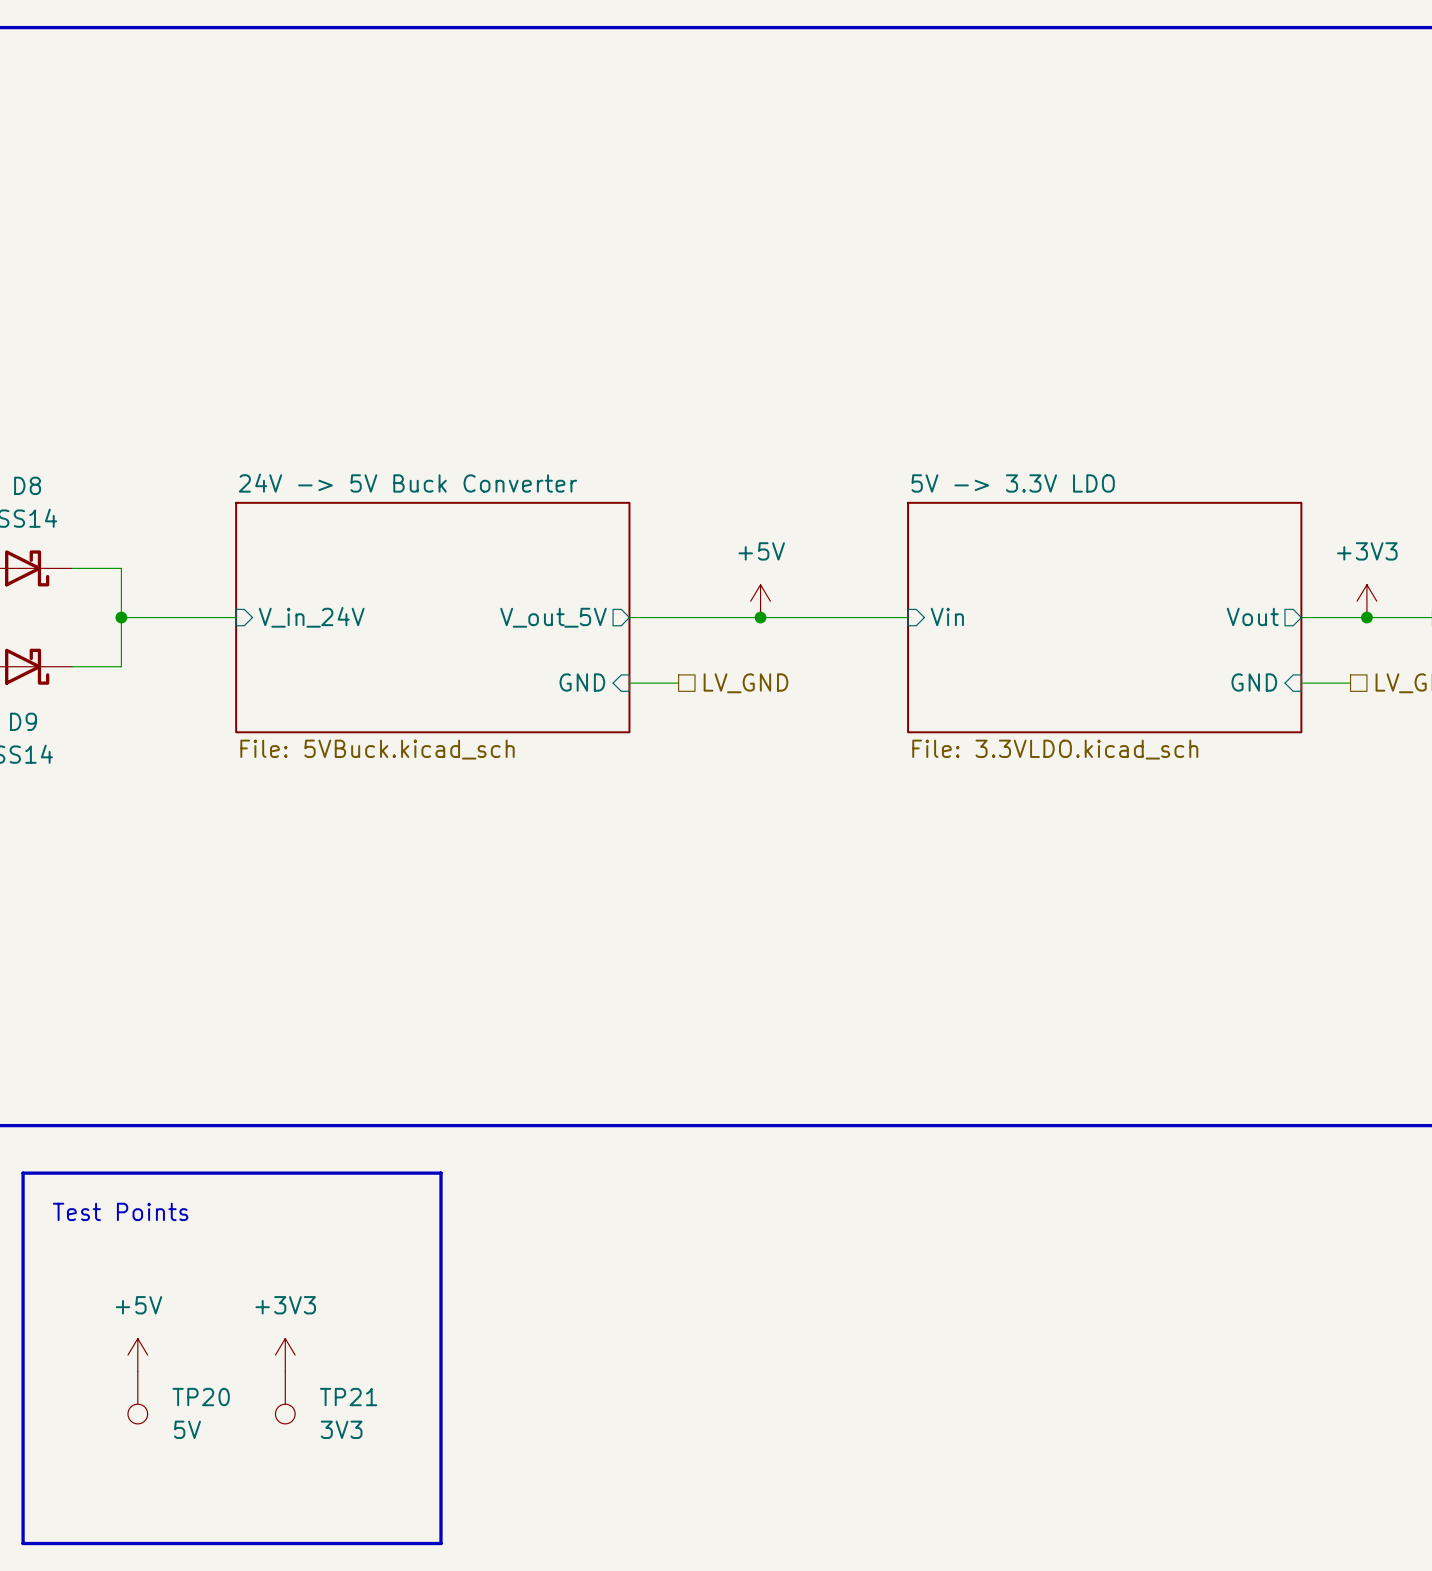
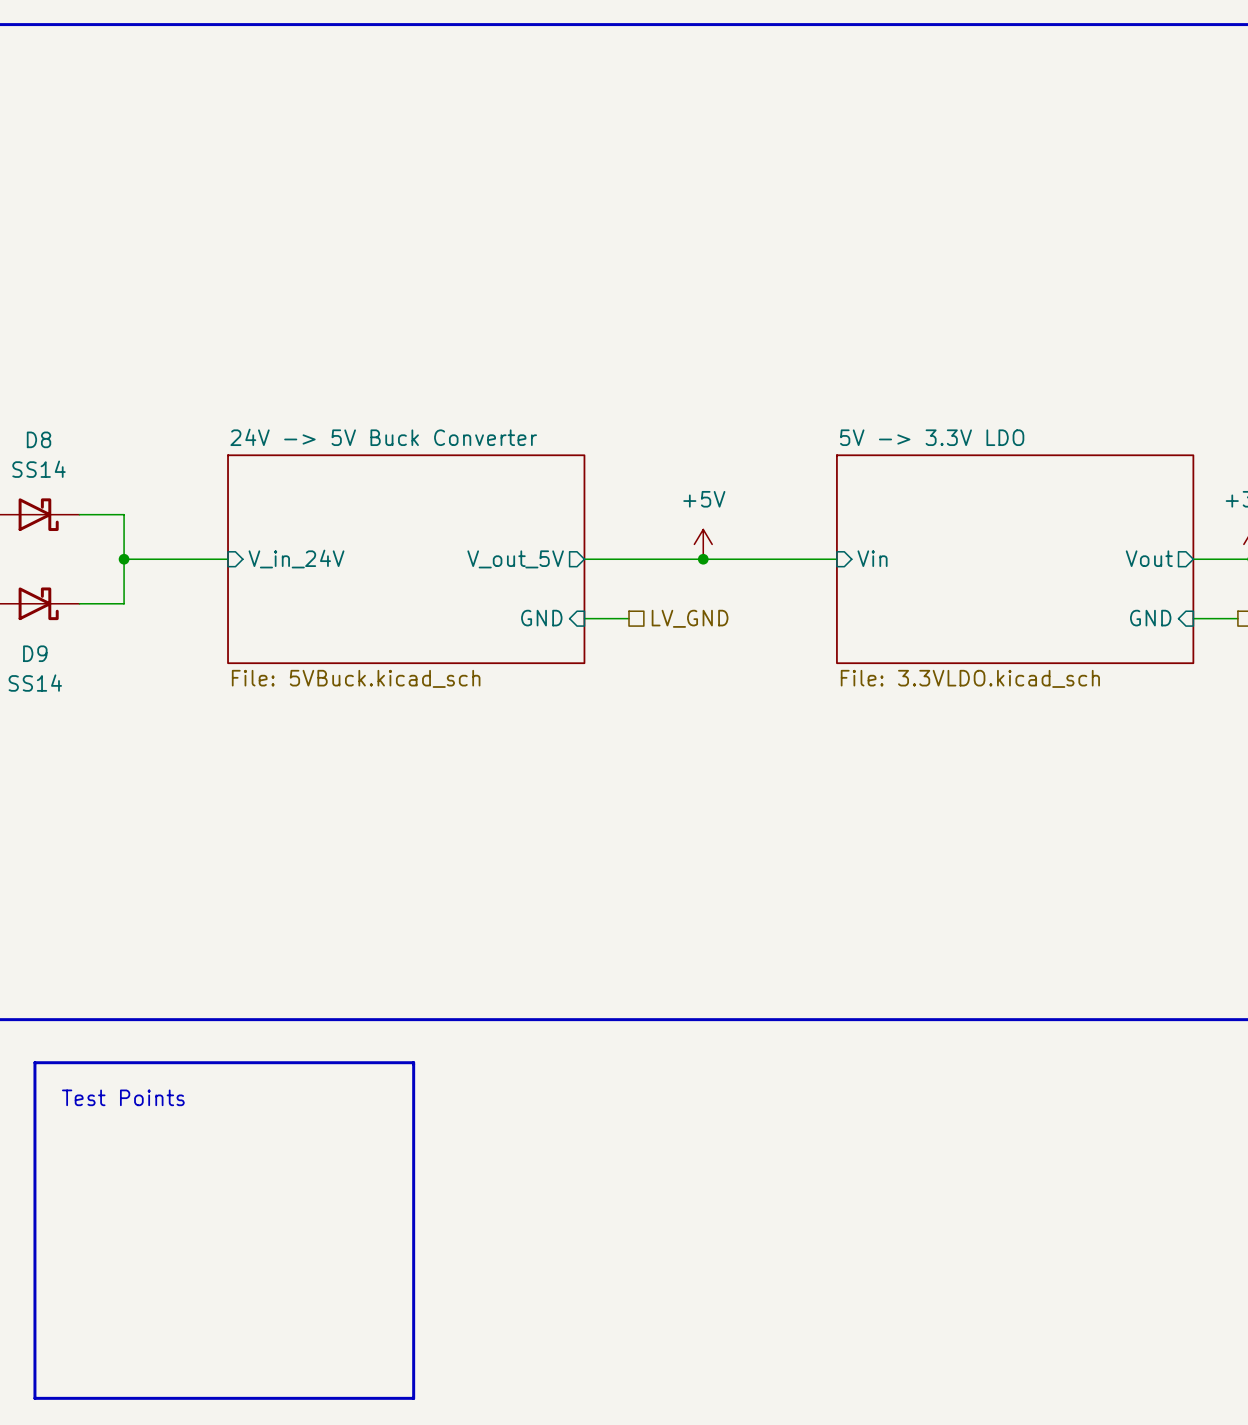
power symbol: +5V (137, 1355) -> none
power symbol: +3V3 (285, 1355) -> none
TP20: 5V (137, 1397) -> none
TP21: 3V3 (285, 1397) -> none

